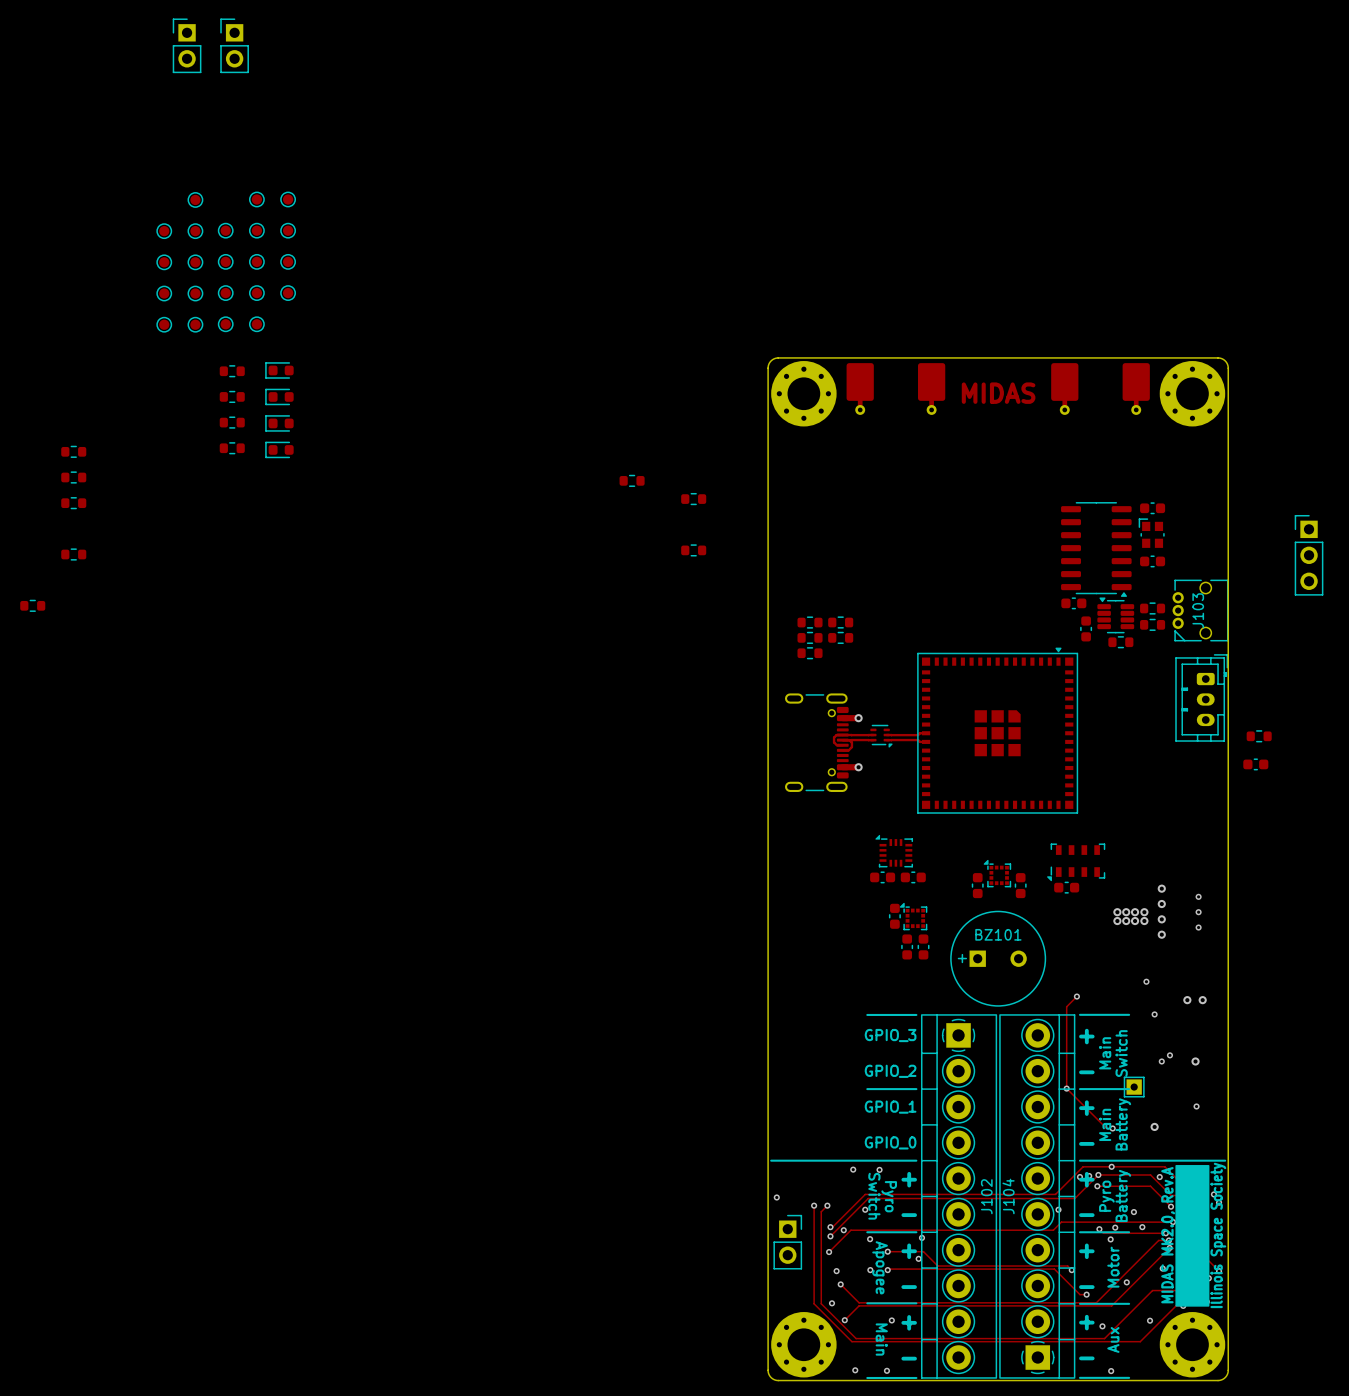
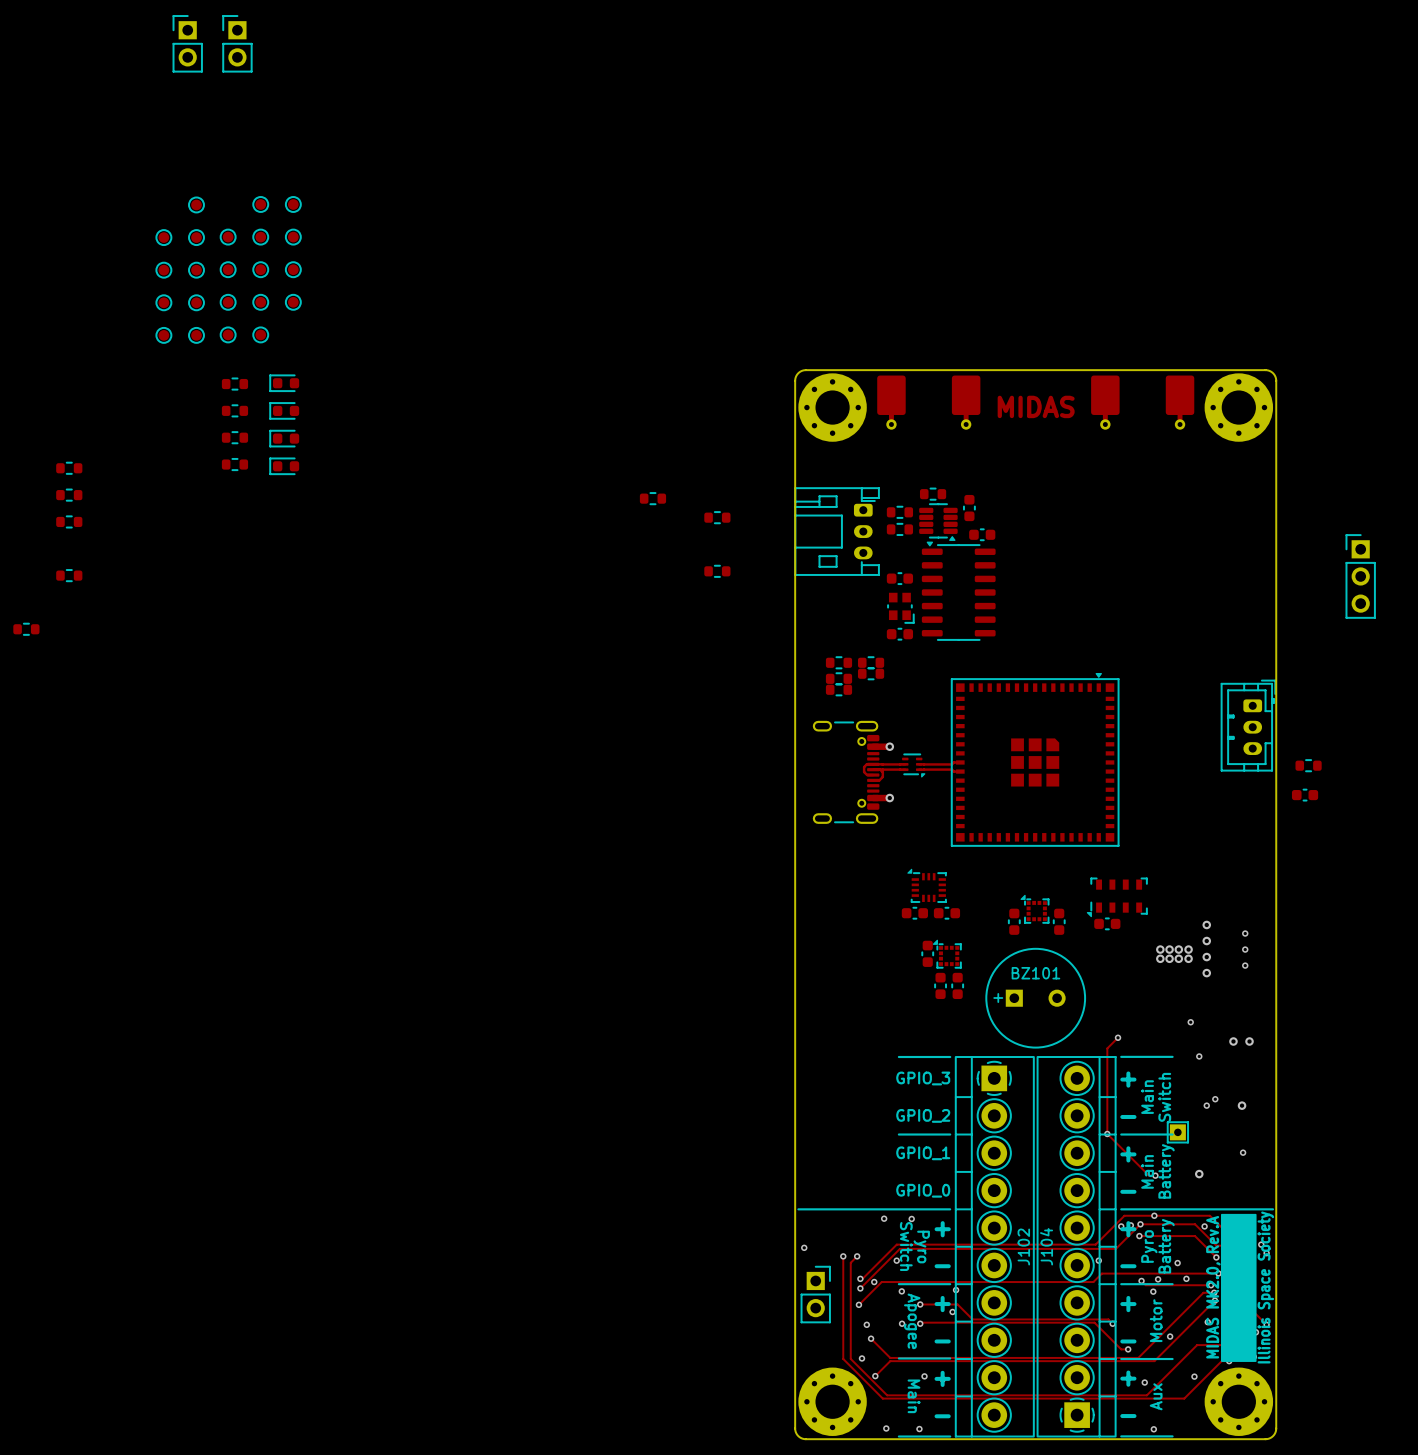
part: none -> (933, 494)
part: none -> (969, 508)
part: none -> (899, 512)
part: (1152, 508) -> none
part: none -> (899, 529)
part: none -> (837, 531)
part: none -> (982, 534)
part: (1151, 533) -> none
part rotation: 0° (1096, 549) -> 180° (958, 591)
part position: (1096, 549) -> (958, 591)
part: none -> (899, 578)
part: (1152, 561) -> none
part: none -> (900, 608)
part: (1073, 603) -> none
part: (1152, 608) -> none
part: none -> (899, 634)
J103: (1200, 610) -> none
part rotation: 0° (1115, 615) -> 180° (938, 522)
part position: (1115, 615) -> (938, 522)
part: (810, 622) -> none
part: (840, 622) -> none
part: (1152, 624) -> none
part: (1086, 628) -> none
part: (1120, 642) -> none
part: none -> (871, 673)
part: none -> (838, 689)

